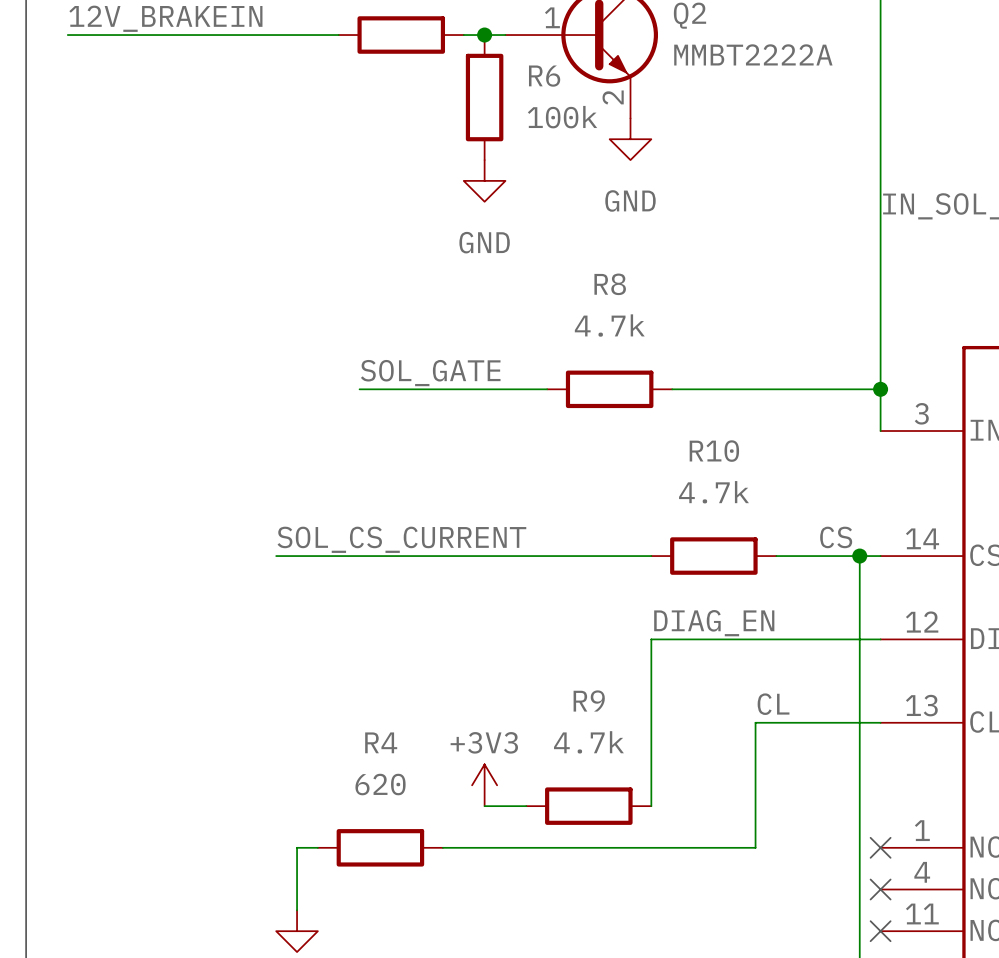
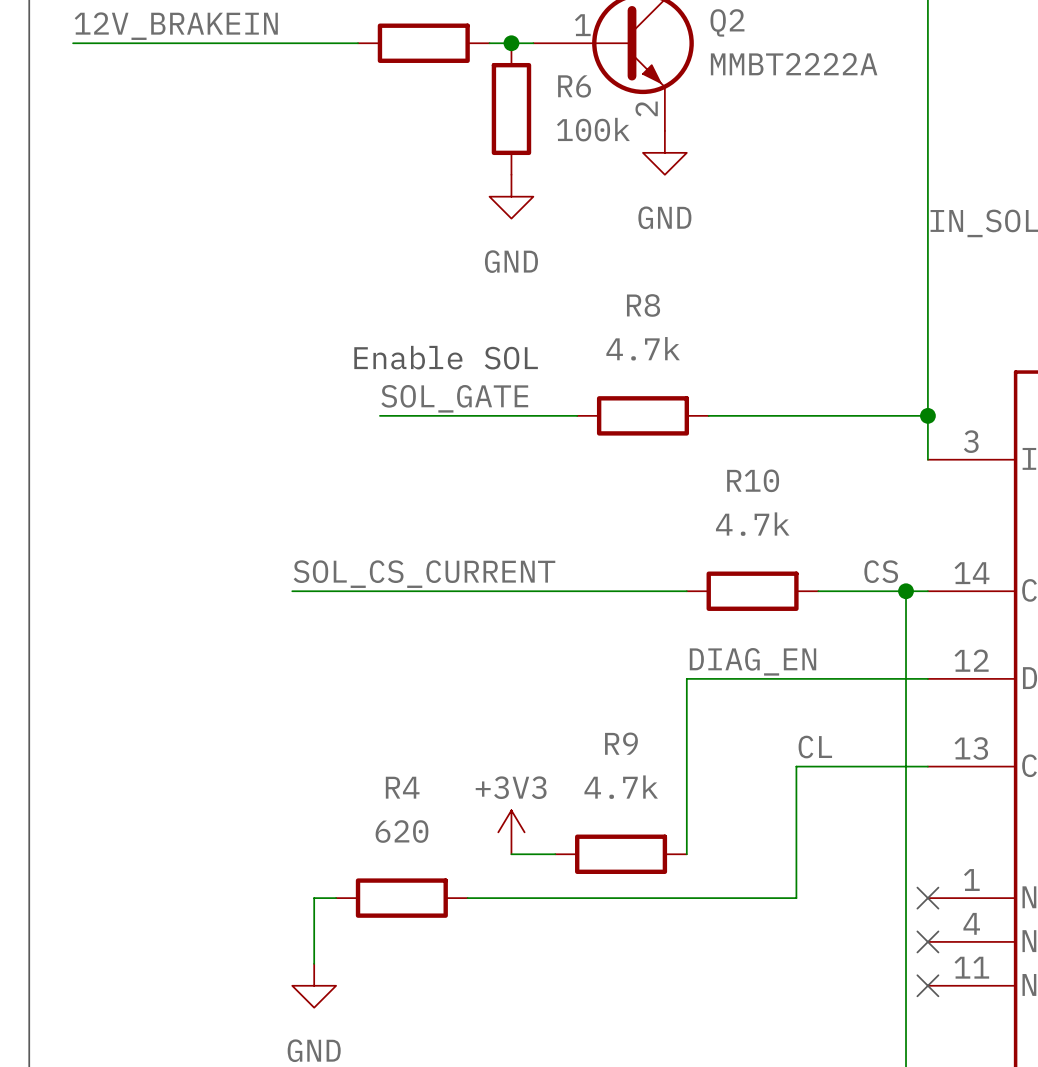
text: none -> Enable SOL (446, 357)

